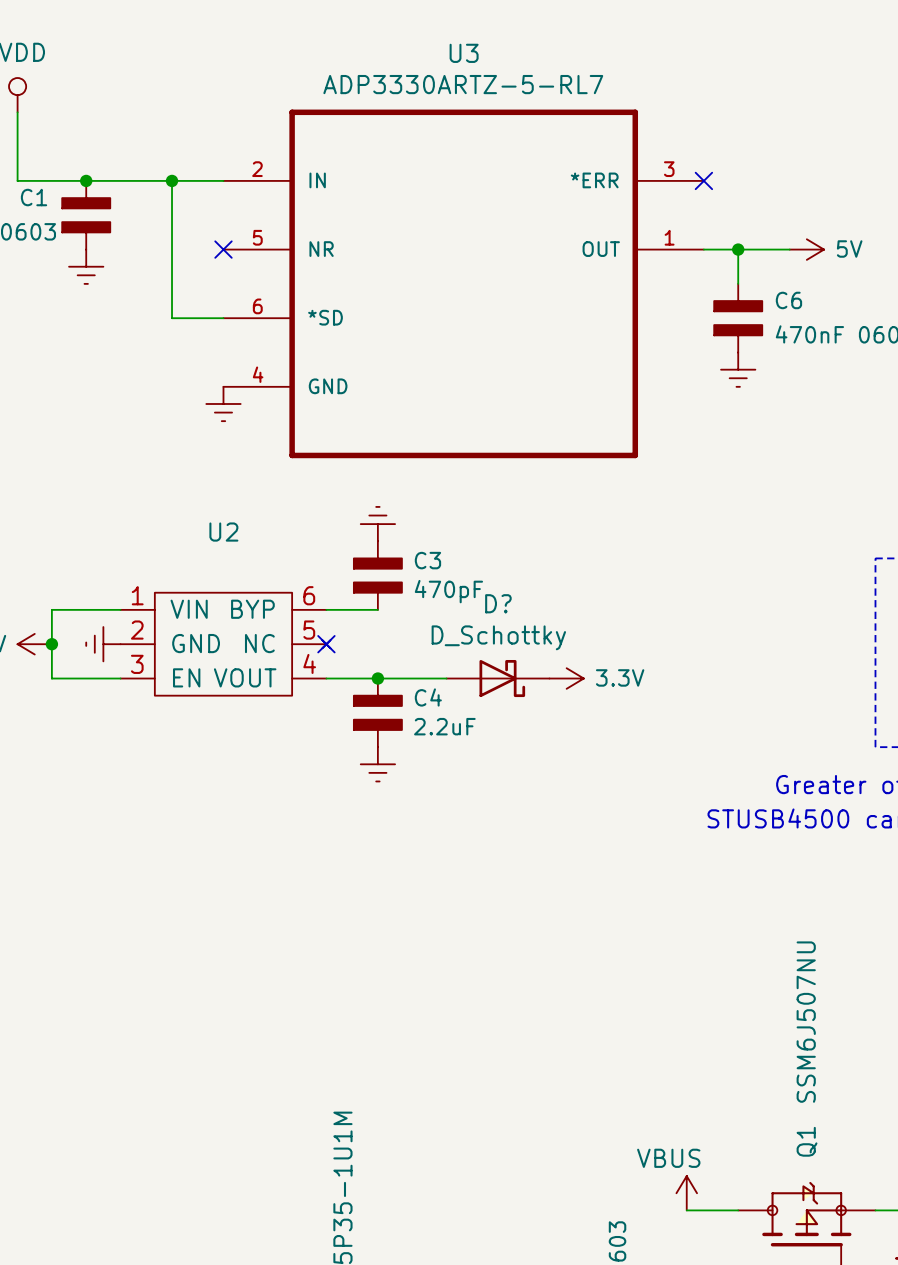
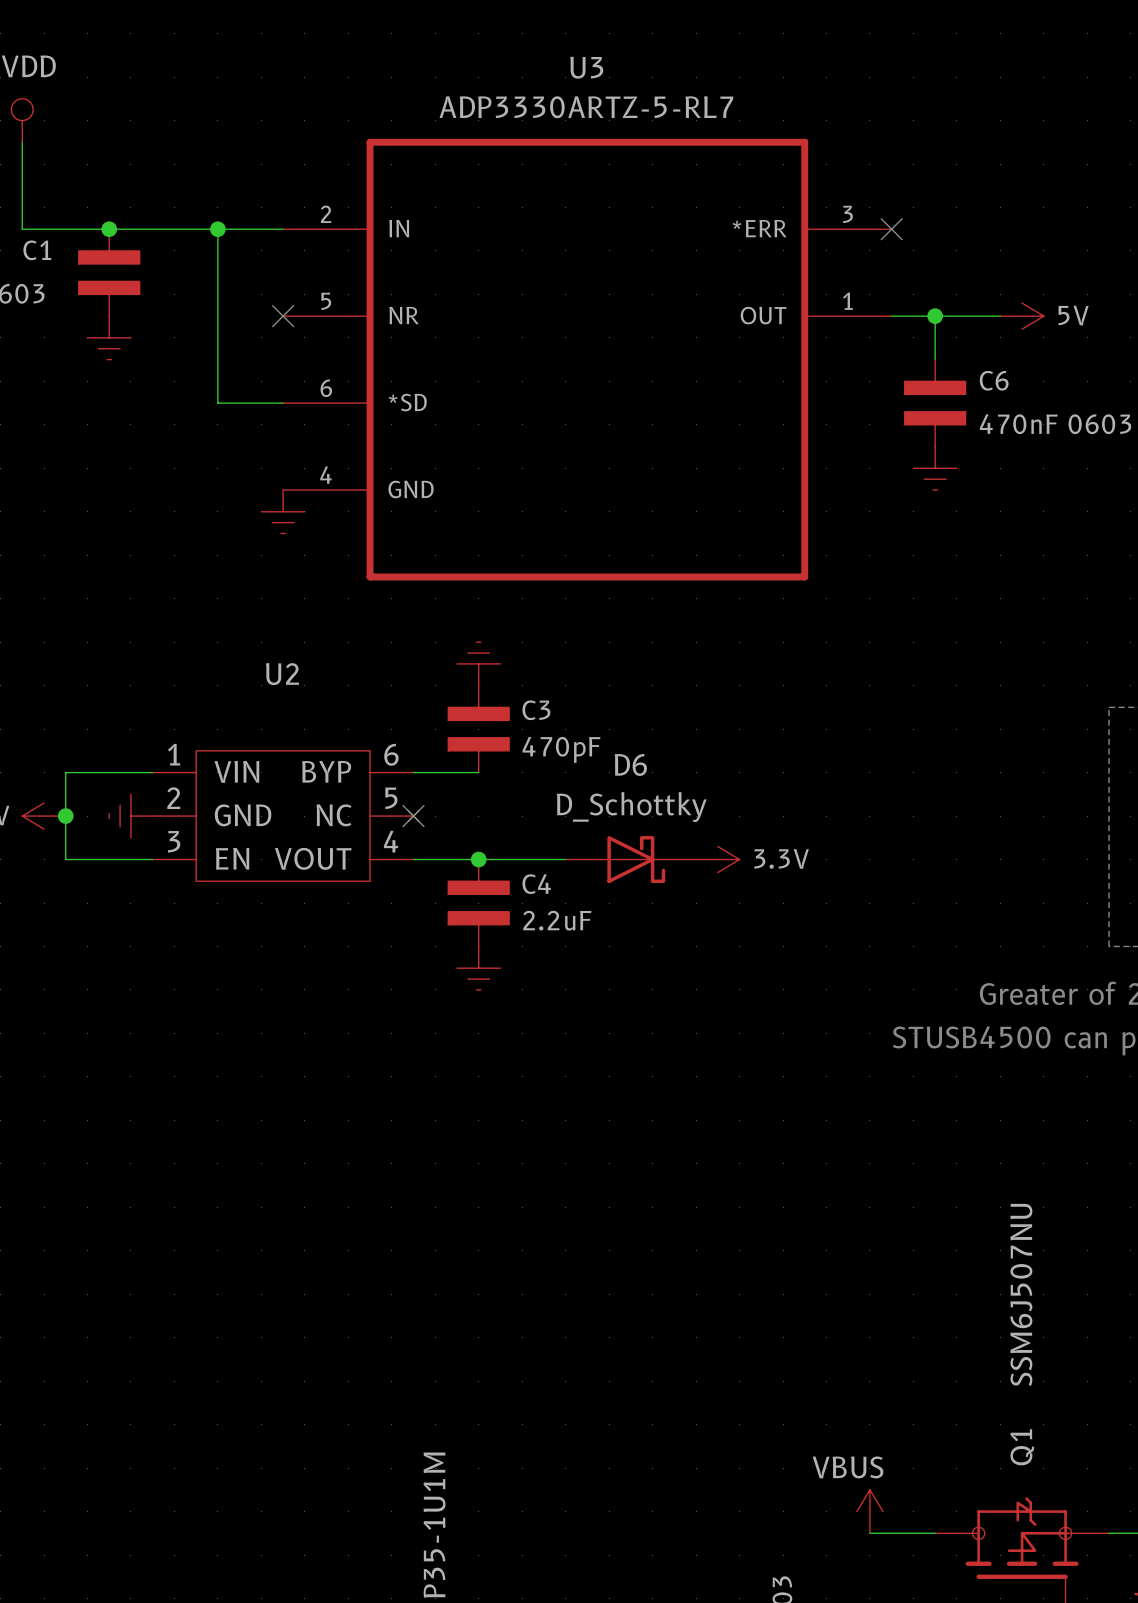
D? name: D? (498, 603) -> D6 (630, 764)

